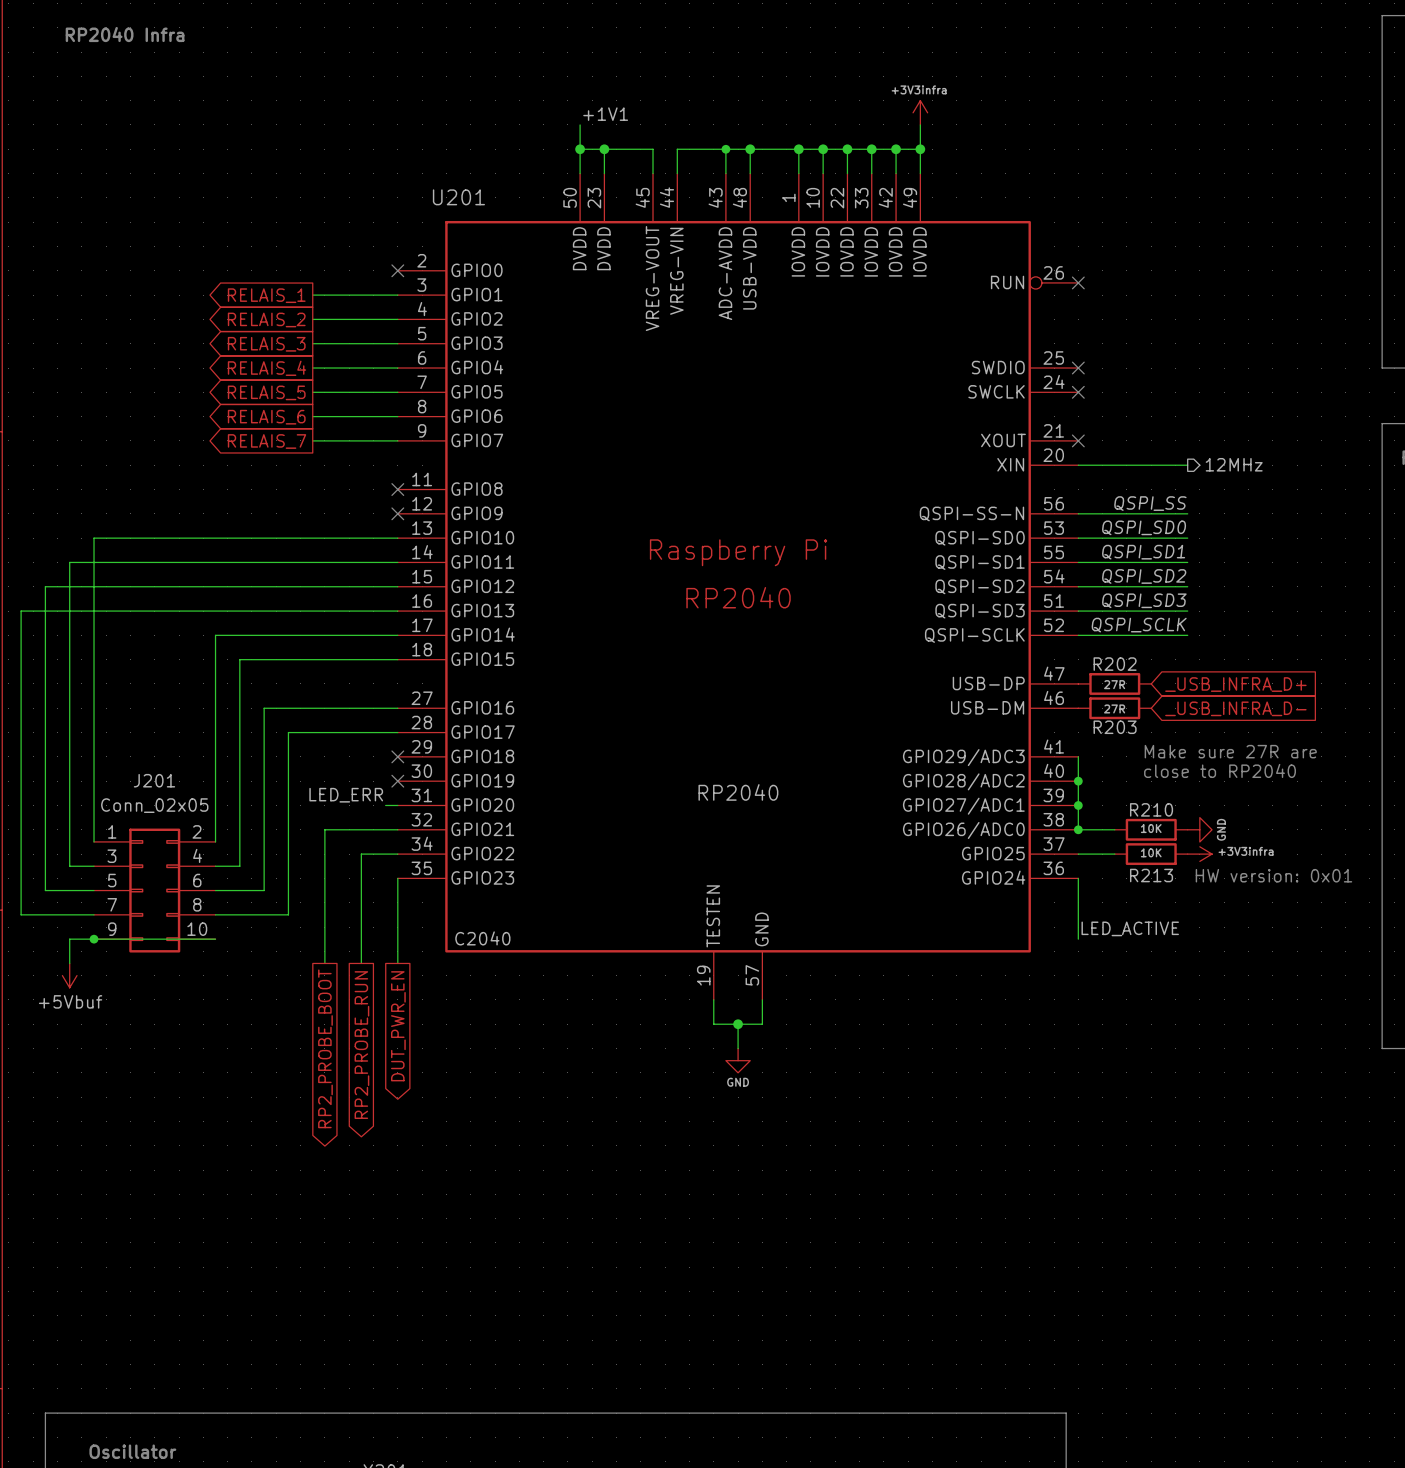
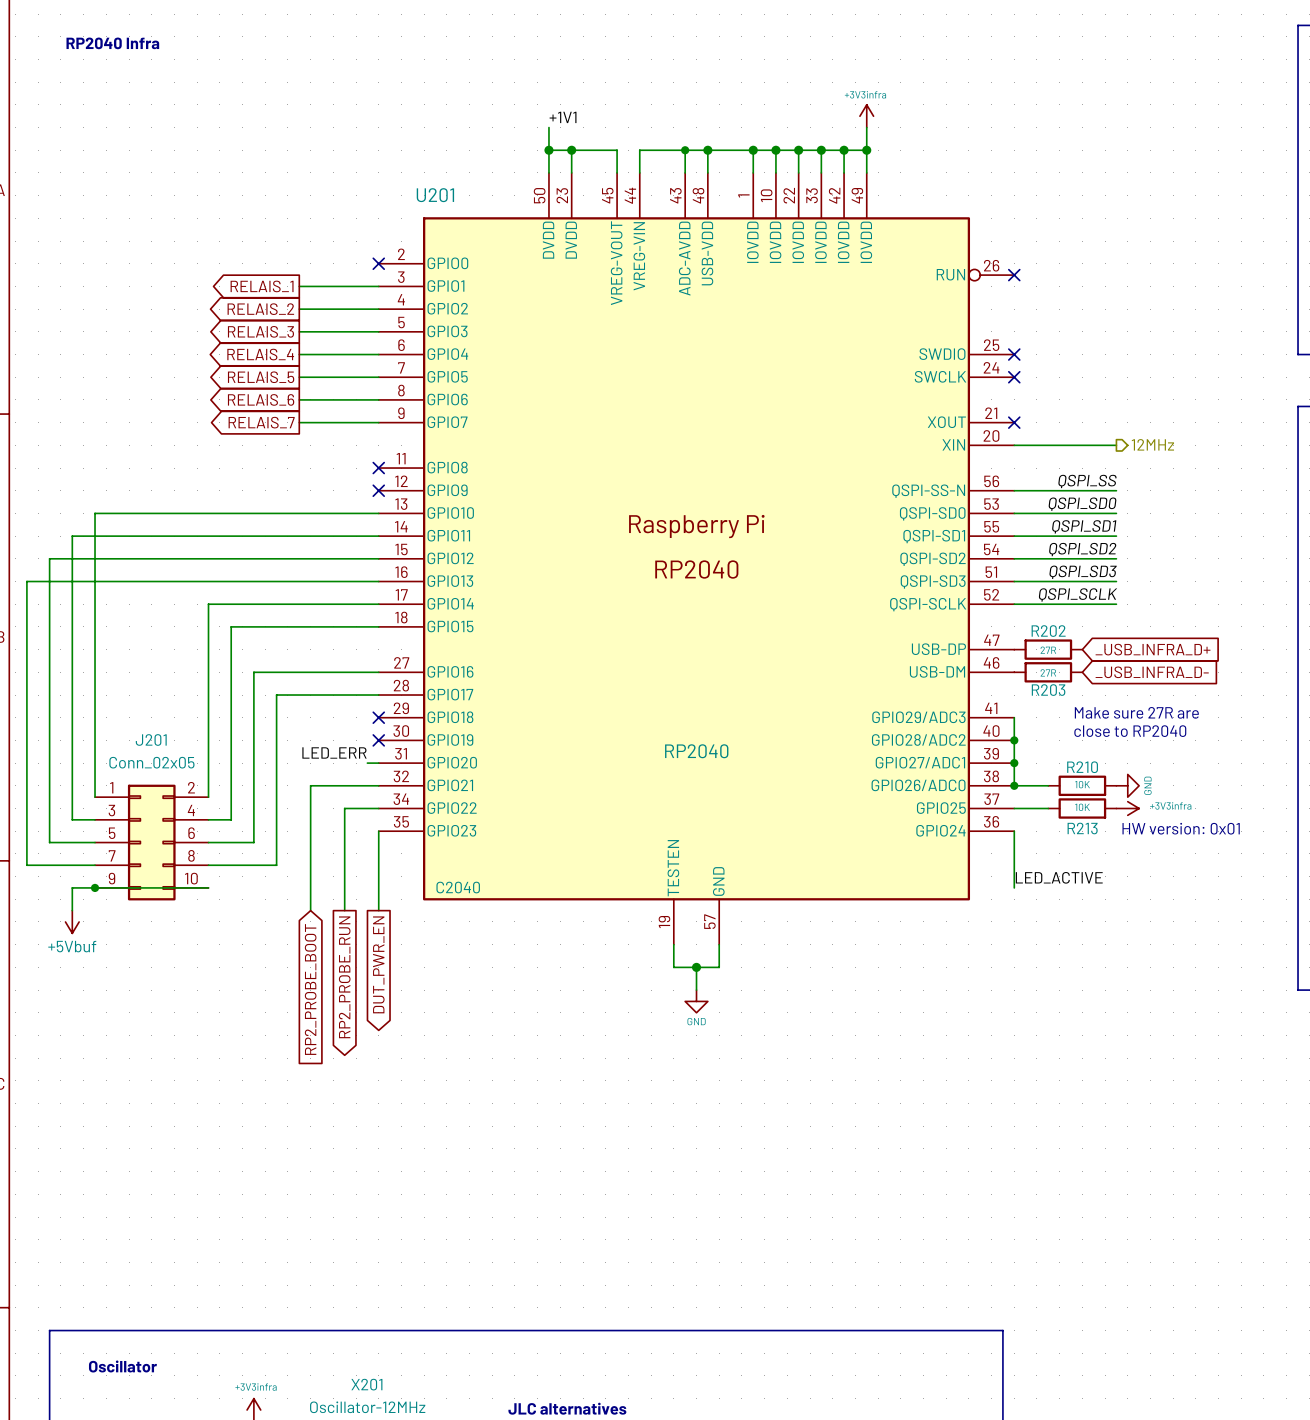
global label shape: output (325, 1048) -> input (310, 989)

